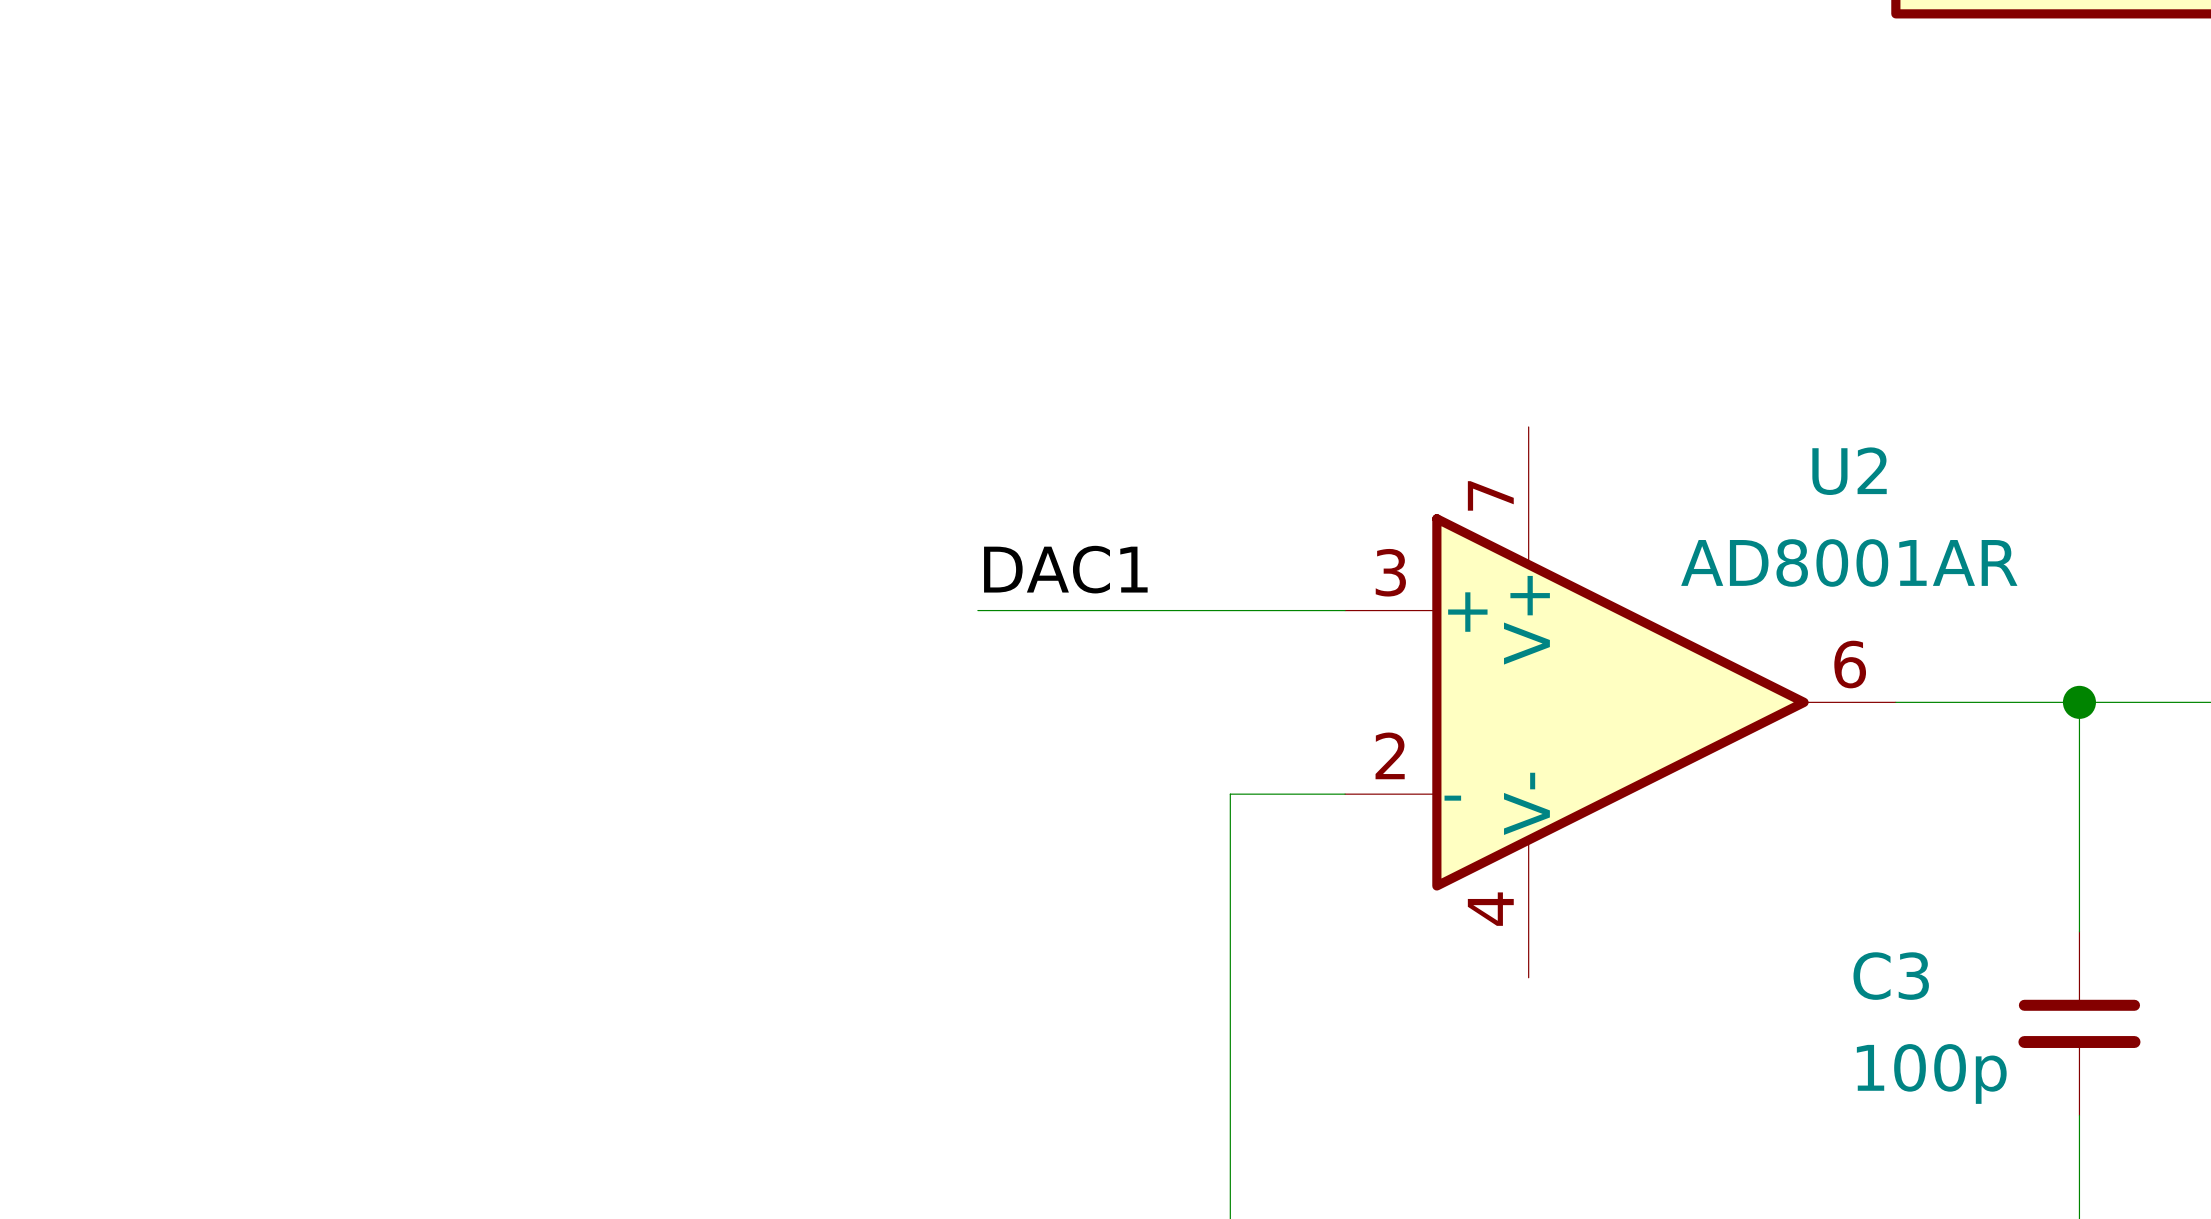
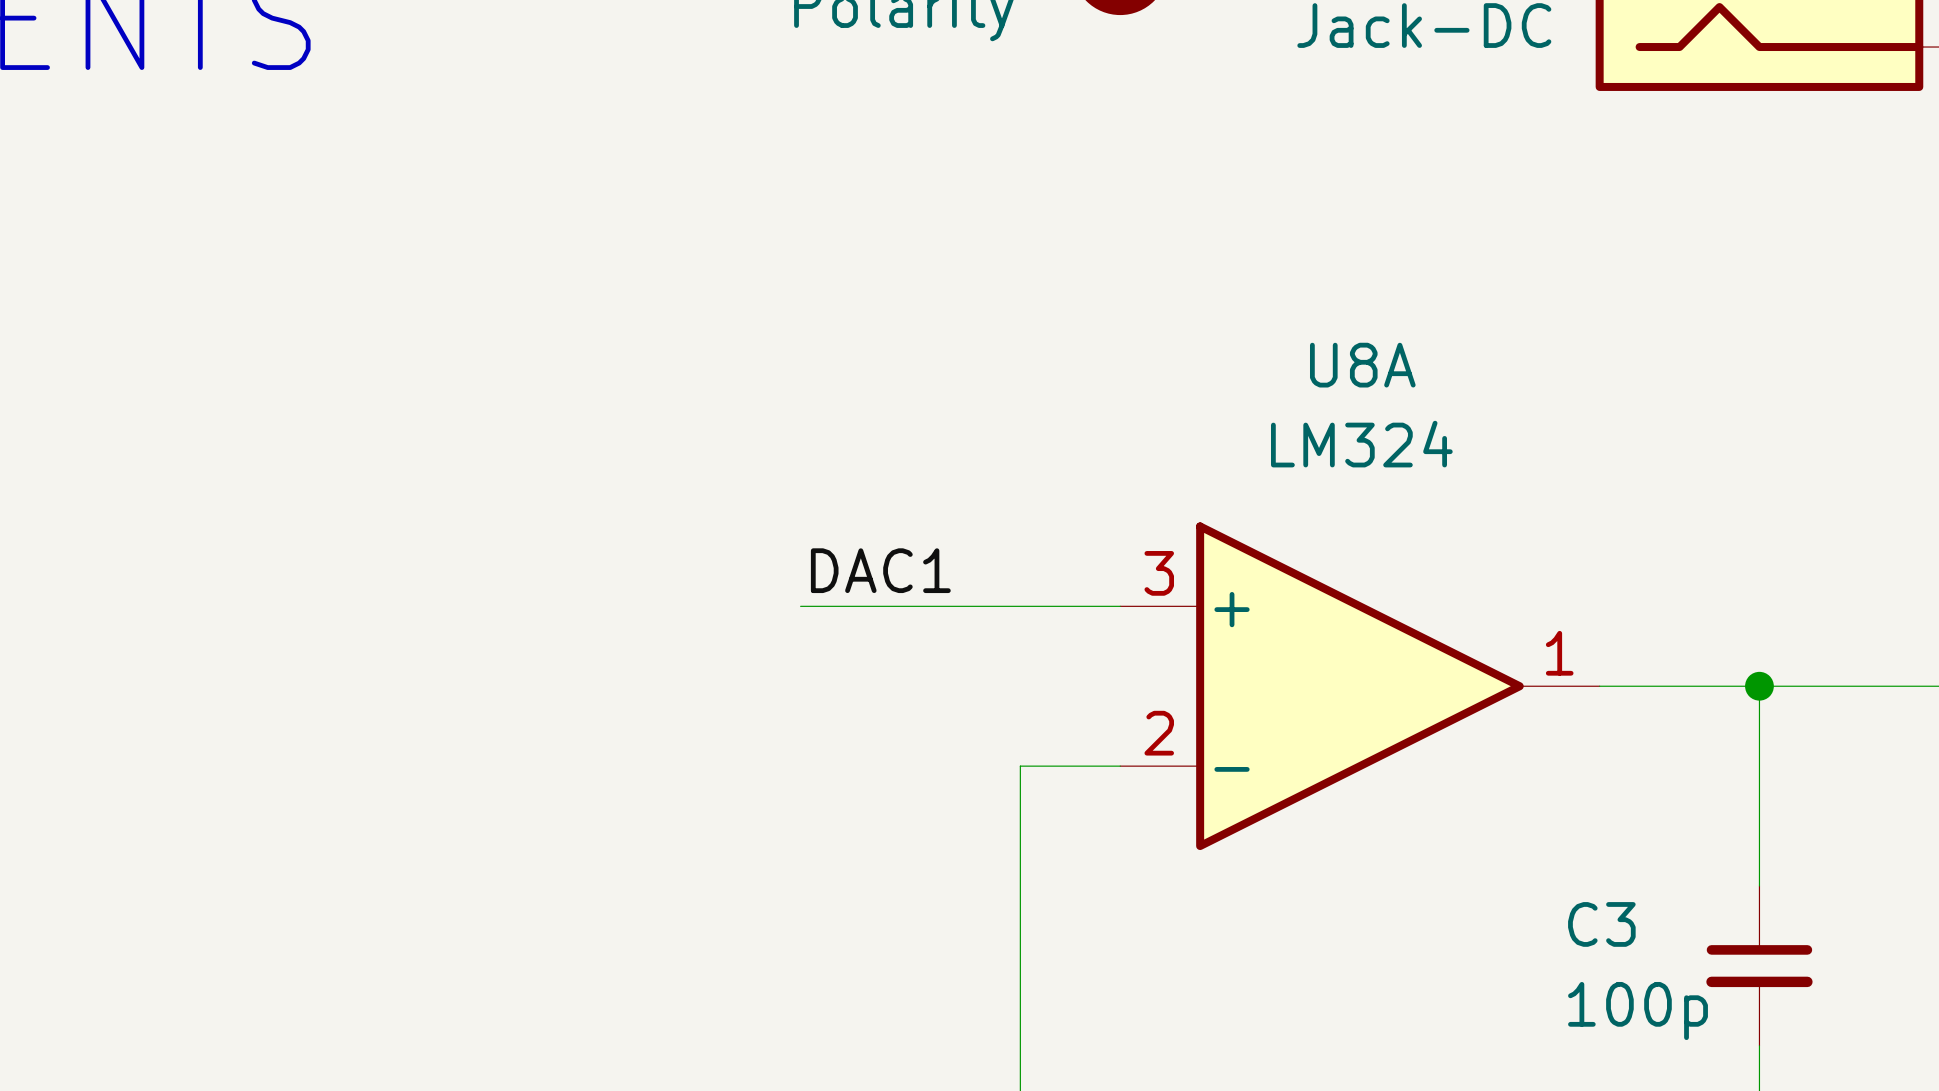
U2: AD8001AR (1620, 702) -> none
U8A: none -> LM324 (1359, 686)

